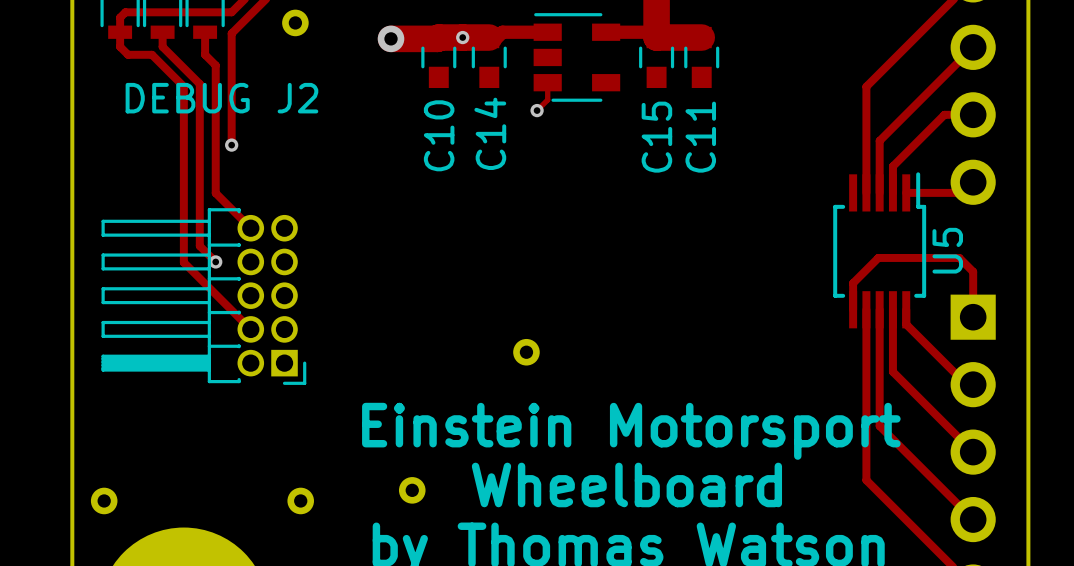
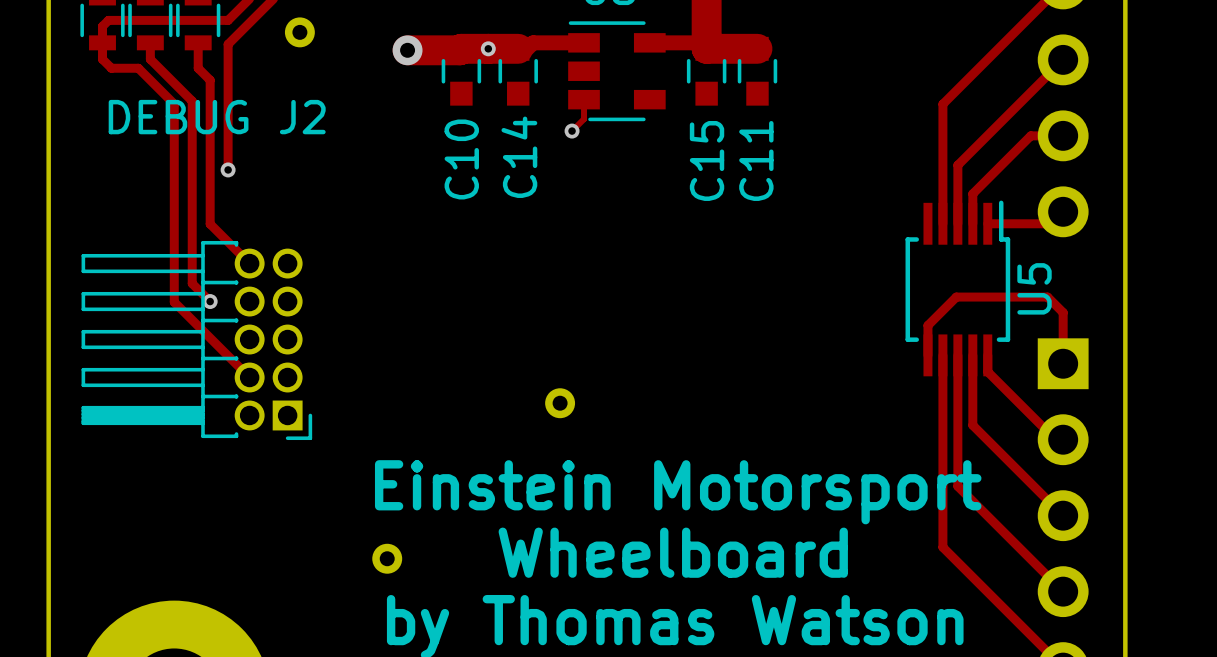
part: none -> (387, 558)
part: (412, 490) -> none
part: (104, 500) -> none
part: (300, 500) -> none

